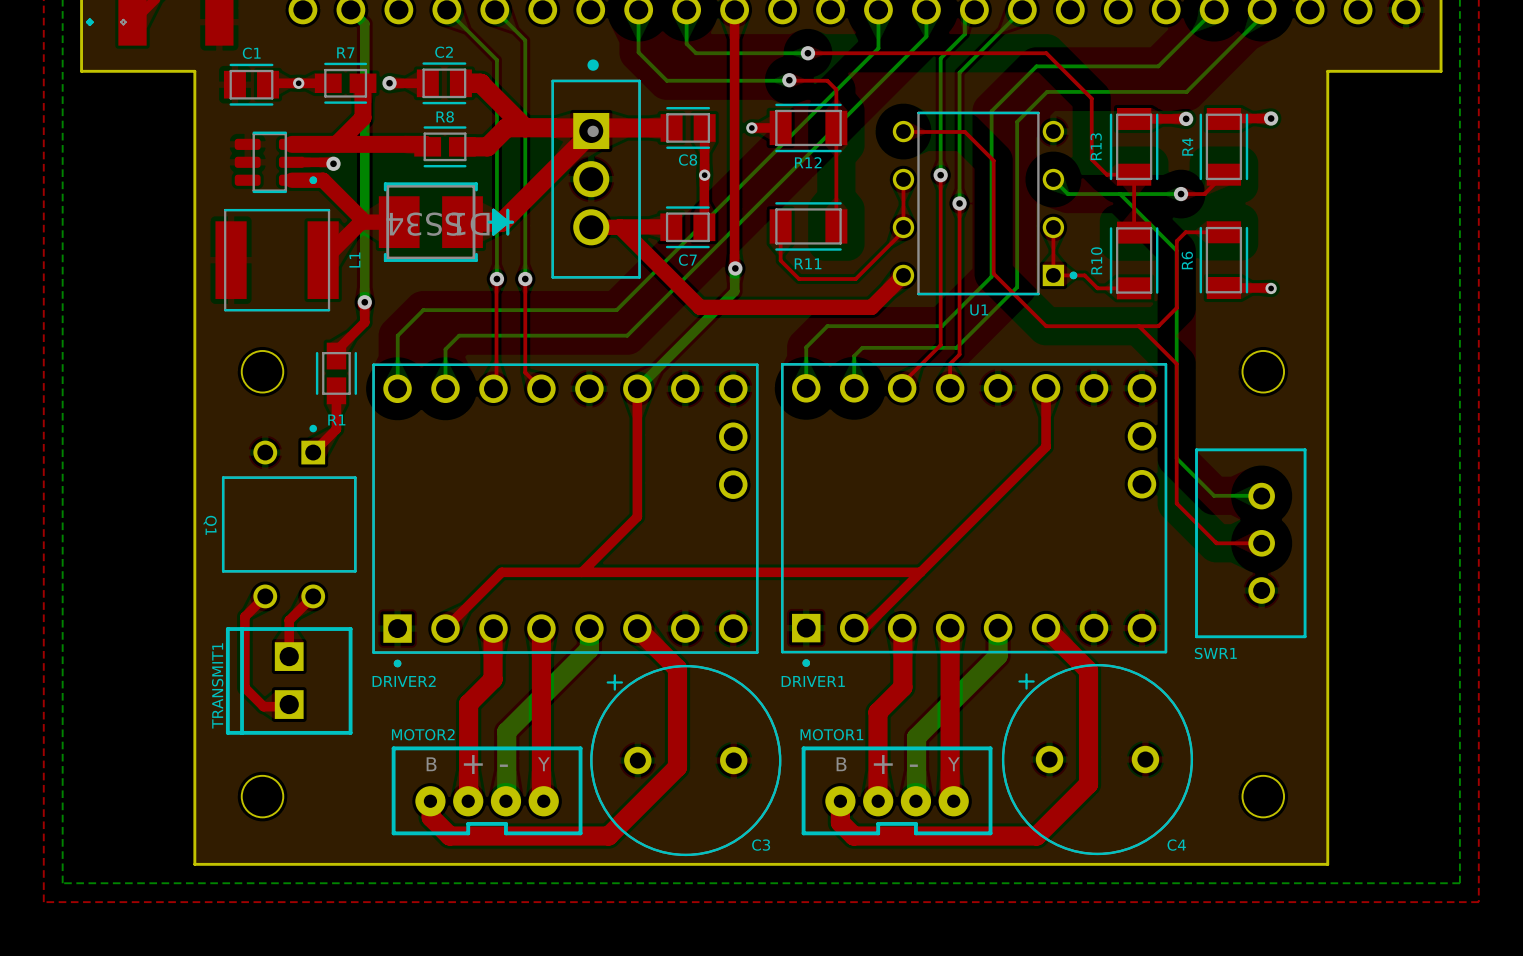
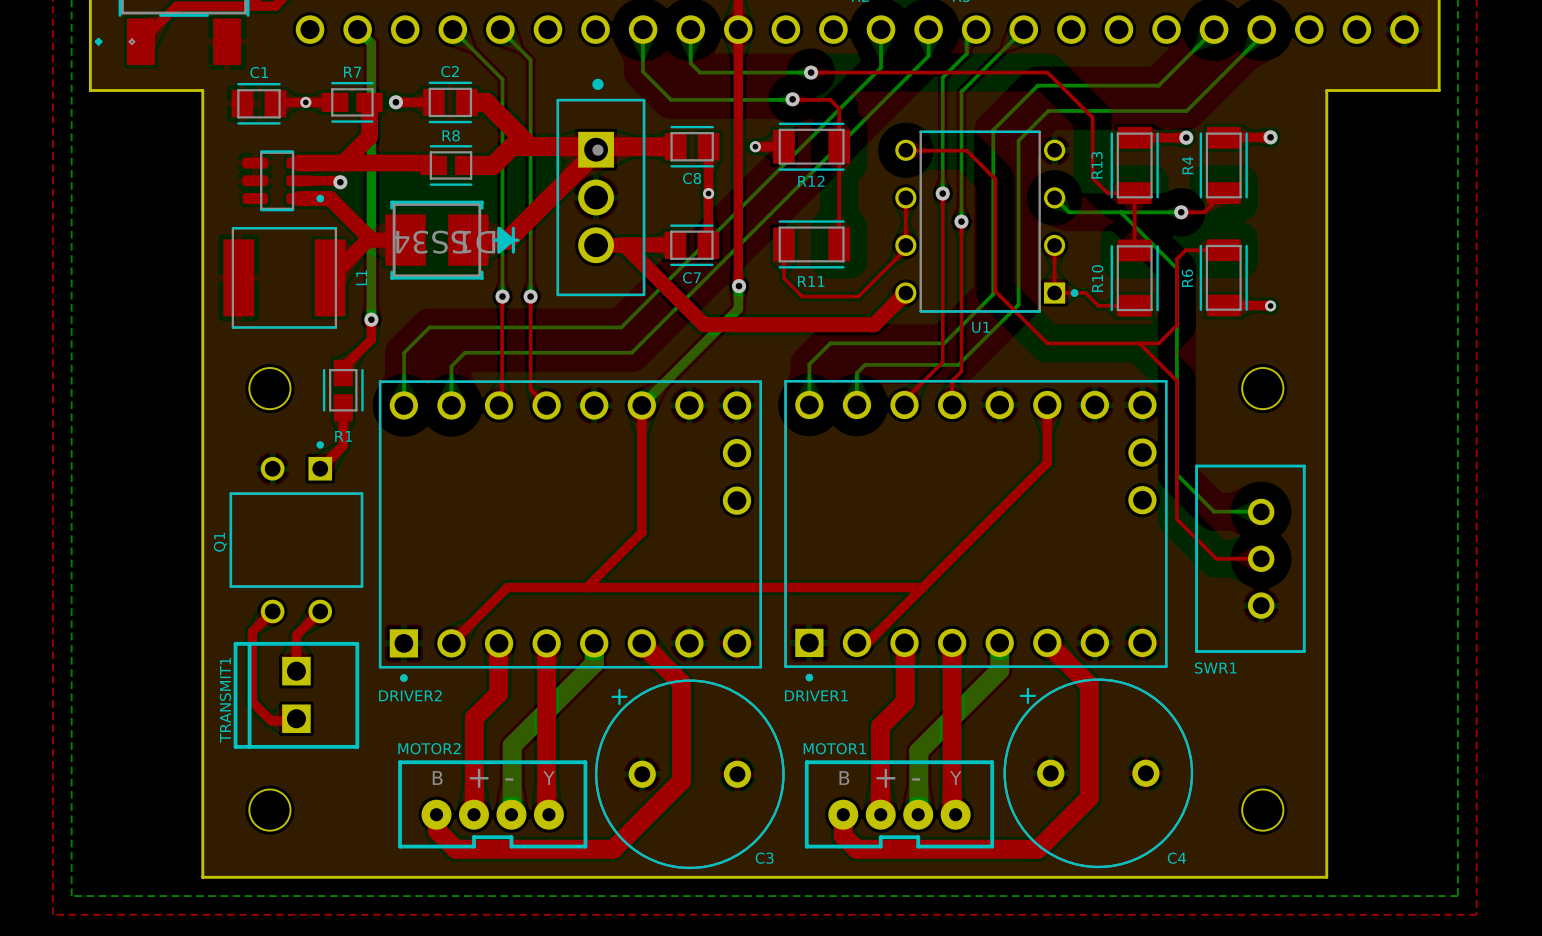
Q1 name rotation: 0° (210, 525) -> 180° (220, 542)

